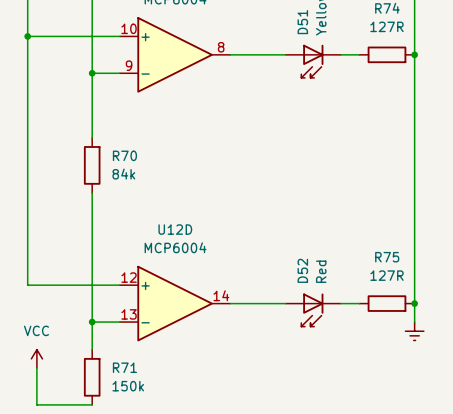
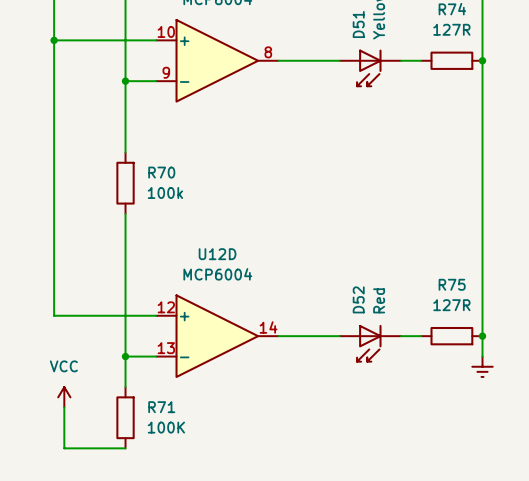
R70 value: 84k (123, 174) -> 100k (165, 192)
R71 value: 150k (128, 386) -> 100K (166, 427)

